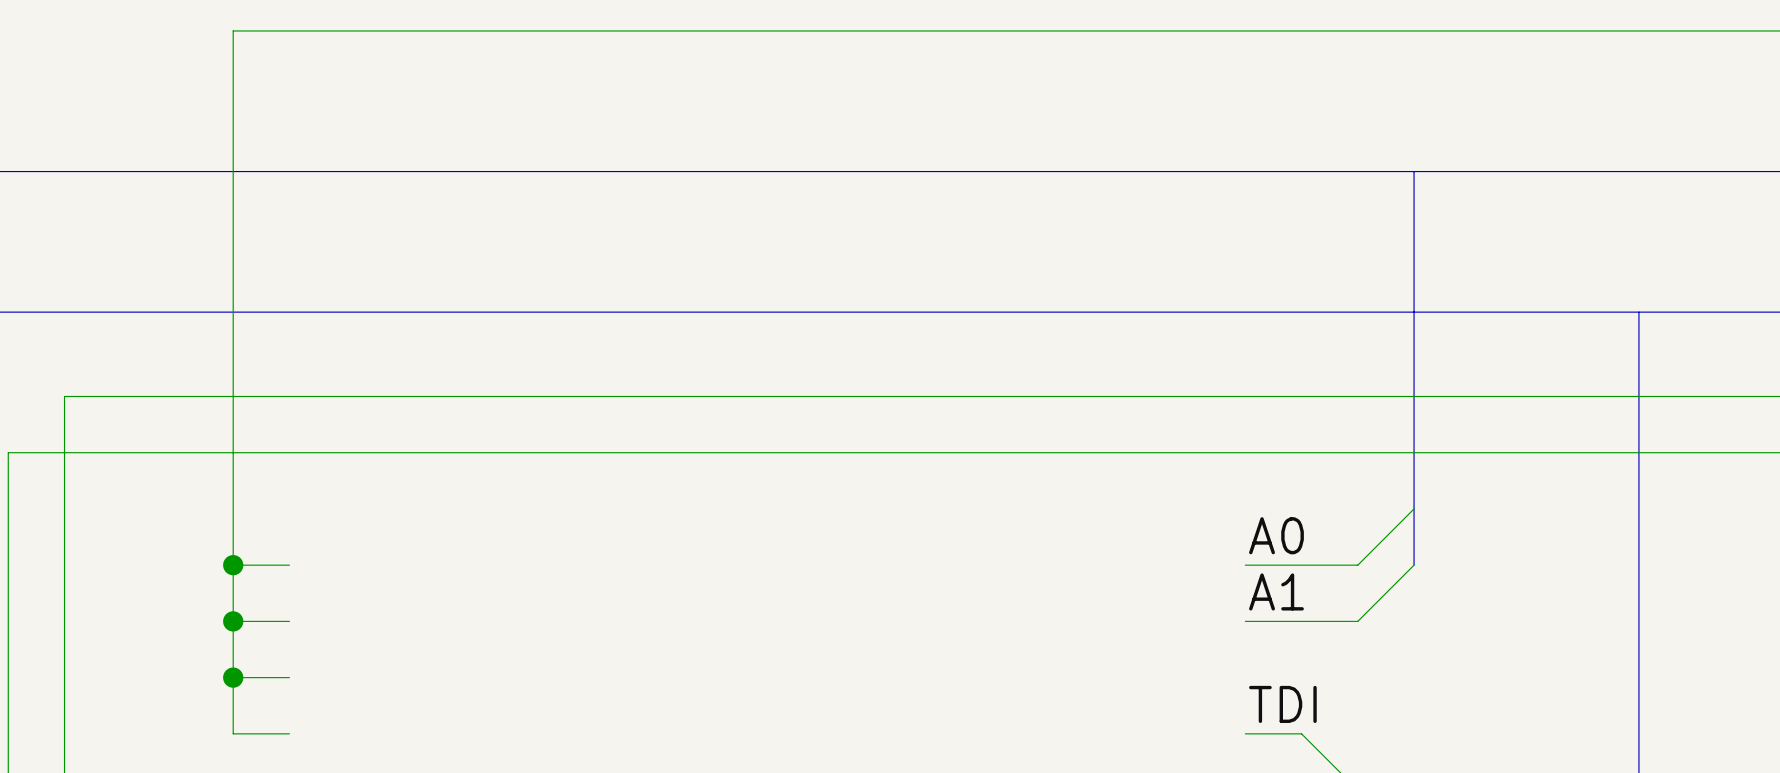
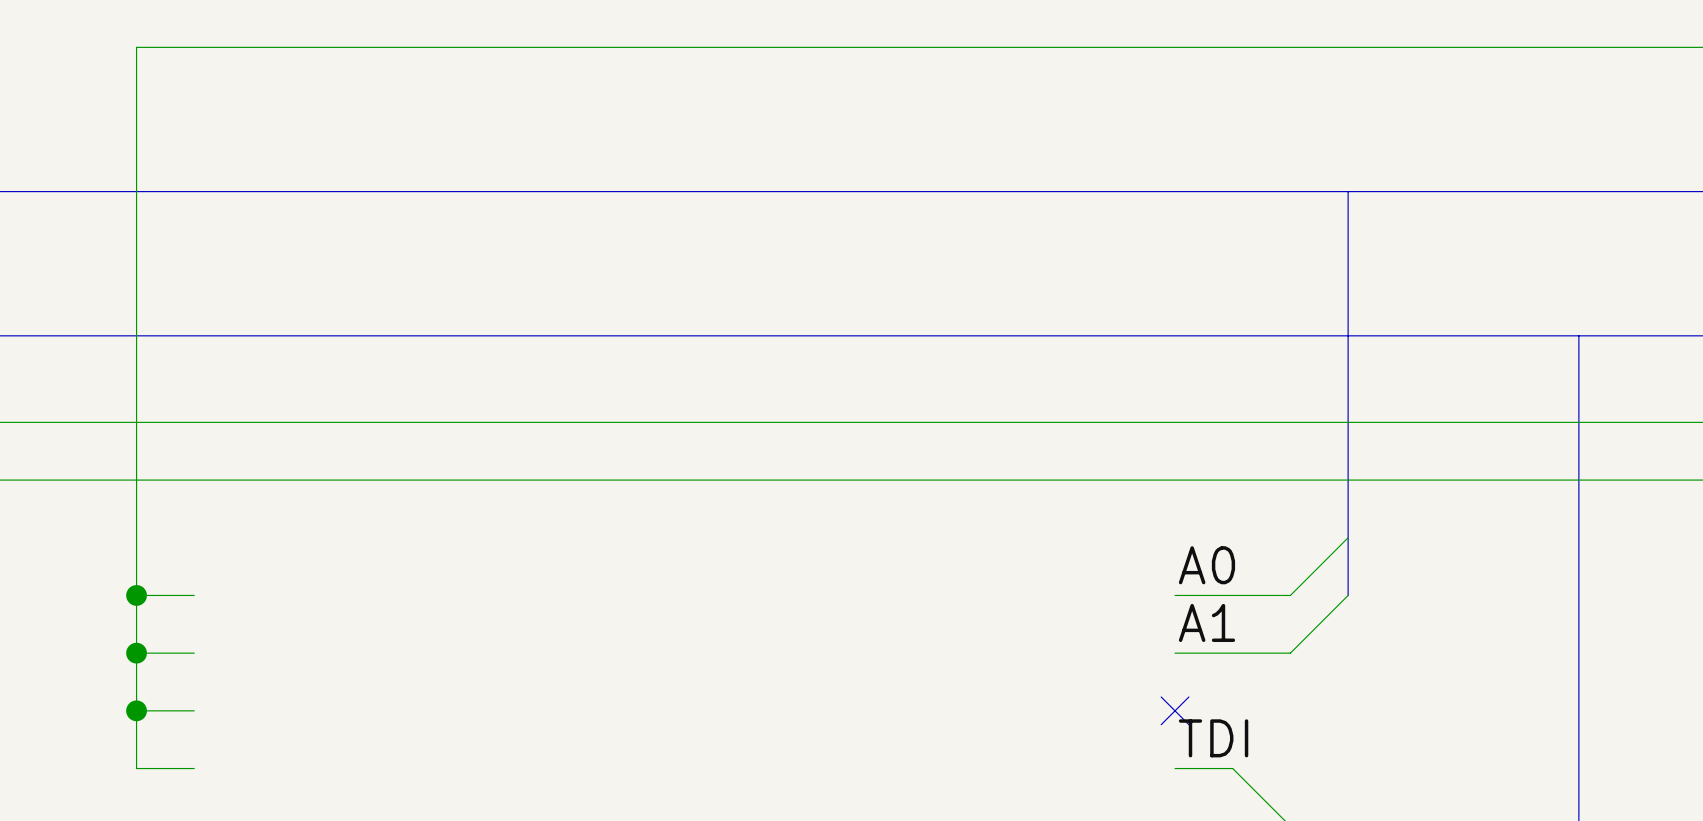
no-connect mark: none -> (1175, 710)

